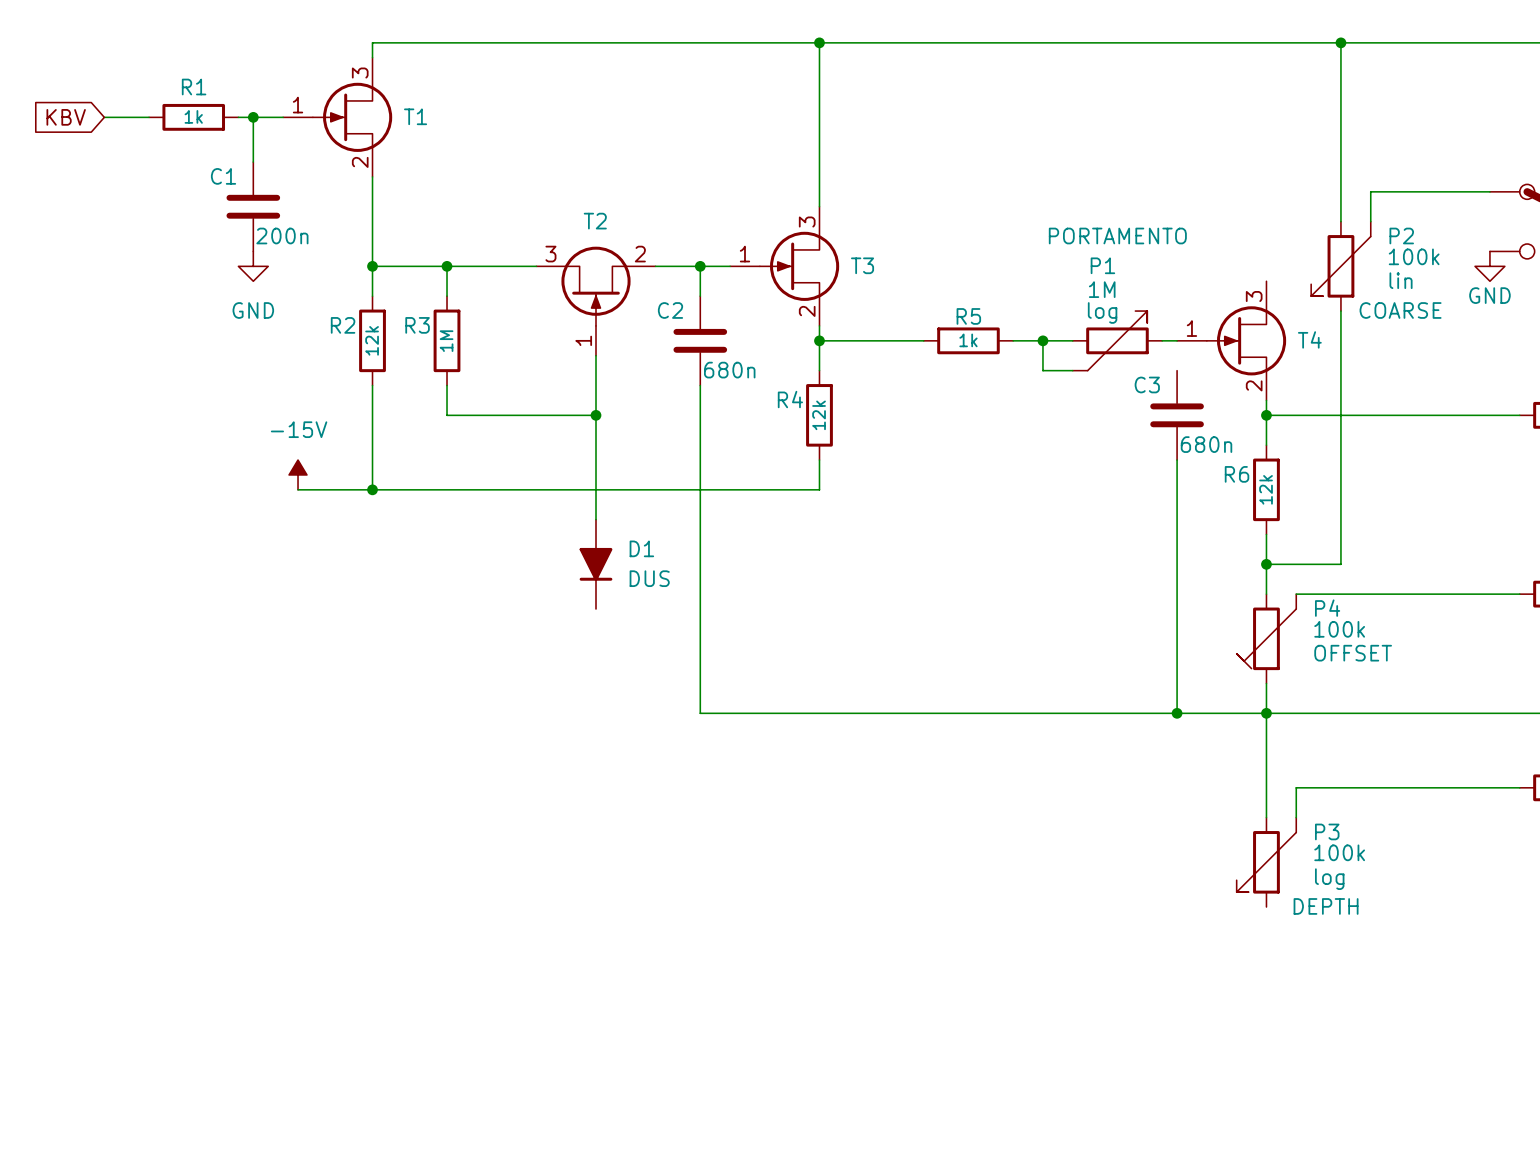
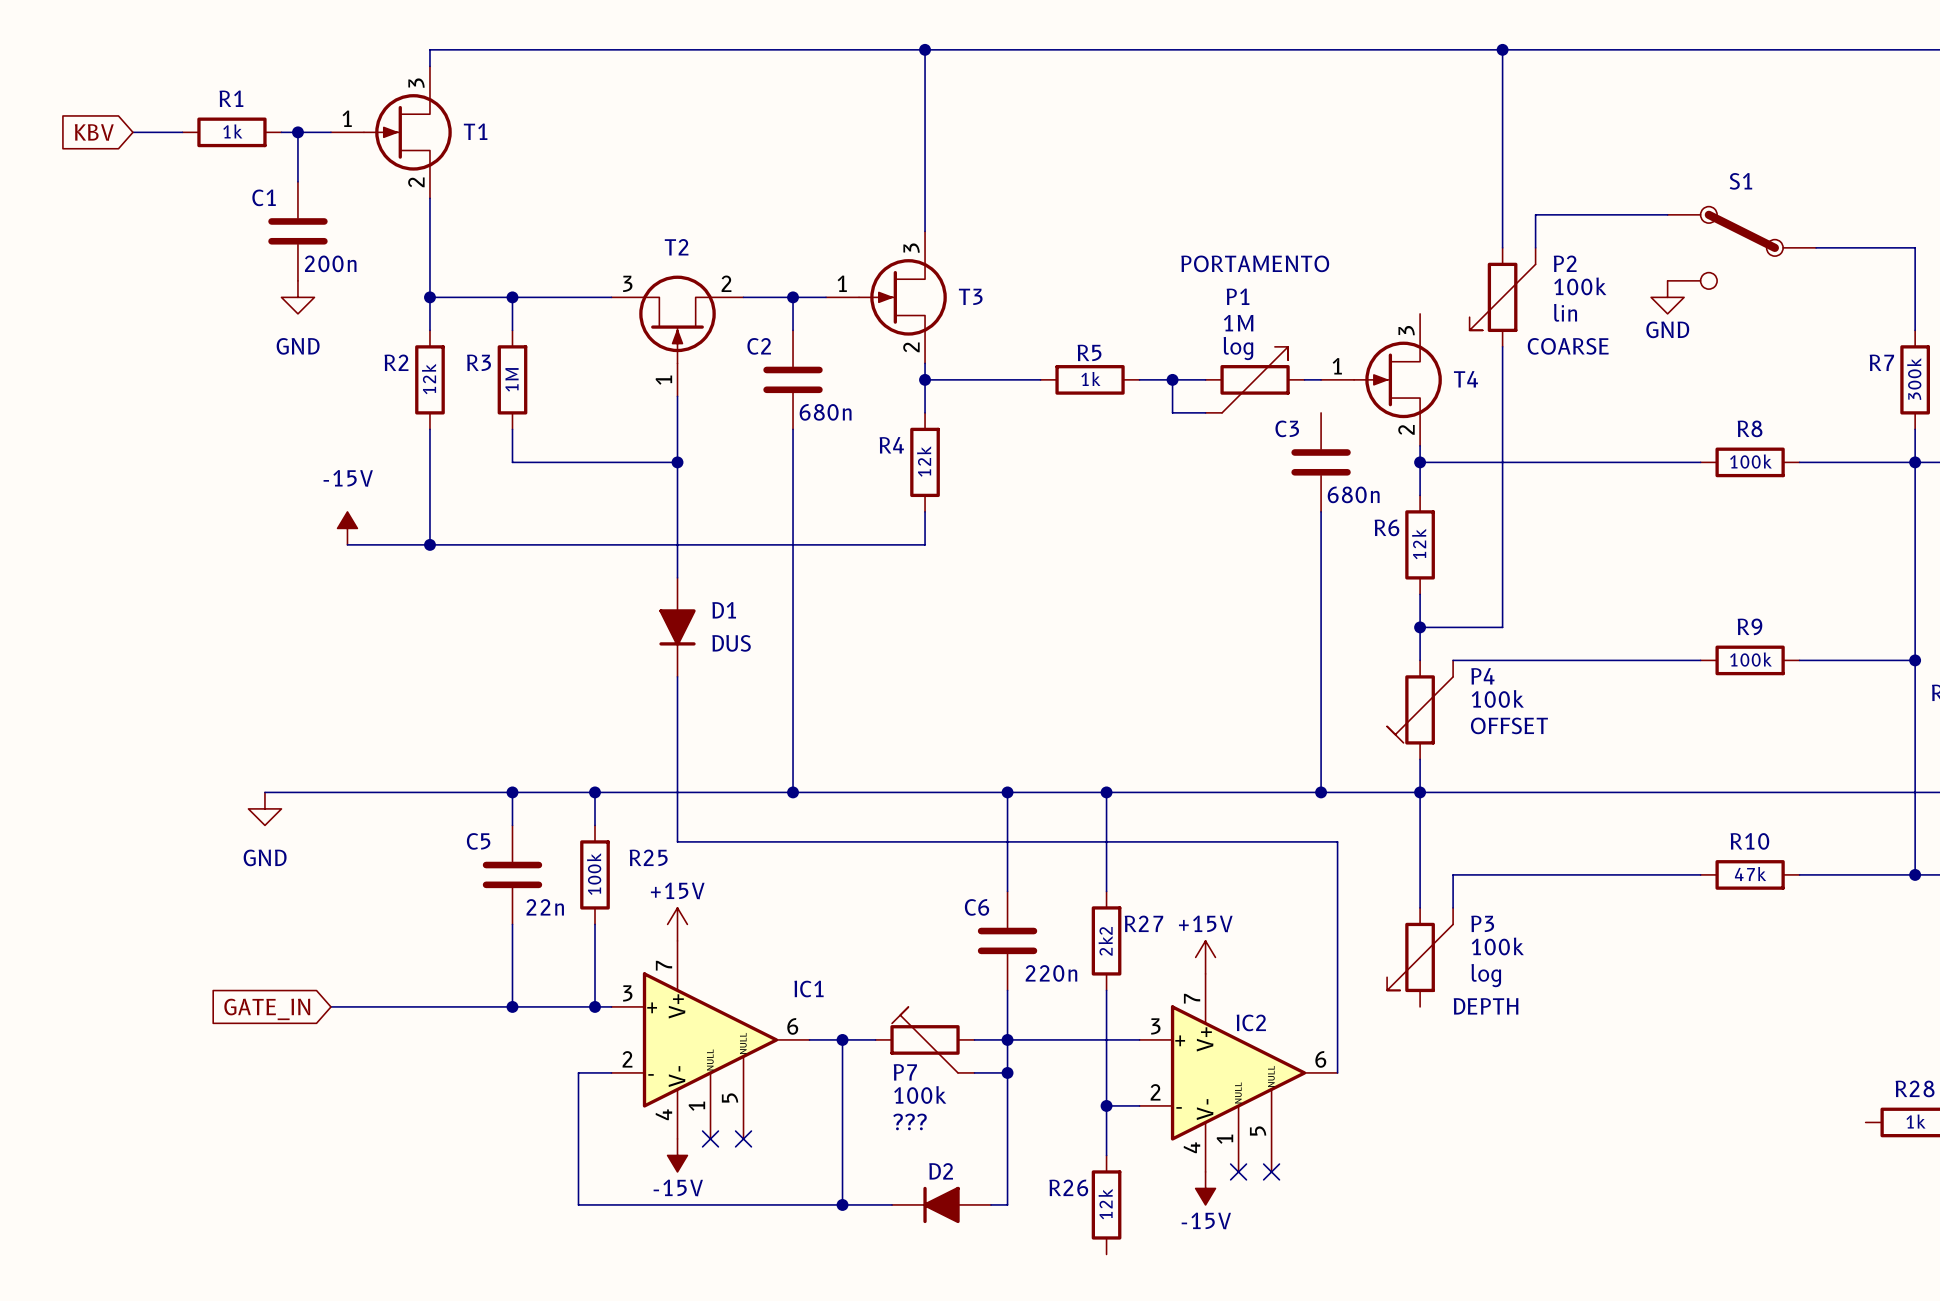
wire: none -> (677, 676) (677, 841) (1337, 841) (1337, 1072)
wire: none -> (264, 792) (793, 792)
wire: none -> (512, 792) (512, 825)
junction: none -> (512, 792)
wire: none -> (595, 792) (595, 825)
junction: none -> (595, 792)
junction: none -> (793, 792)
wire: none -> (1007, 792) (1007, 891)
junction: none -> (1007, 792)
wire: none -> (1106, 792) (1106, 891)
junction: none -> (1106, 792)
power symbol: none -> GND (264, 808)
C5: none -> 22n (512, 874)
R25: none -> 100k (595, 874)
wire: none -> (512, 924) (512, 1006)
wire: none -> (595, 924) (595, 1006)
power symbol: none -> +15V (677, 924)
C6: none -> 220n (1007, 940)
R27: none -> 2k2 (1106, 940)
power symbol: none -> +15V (1205, 957)
wire: none -> (1007, 990) (1007, 1204) (991, 1204)
wire: none -> (1106, 990) (1106, 1155)
global label: none -> GATE_IN (267, 1009)
wire: none -> (330, 1006) (611, 1006)
junction: none -> (512, 1006)
junction: none -> (595, 1006)
IC1: none -> (710, 1039)
wire: none -> (809, 1039) (875, 1039)
wire: none -> (842, 1039) (842, 1204)
junction: none -> (842, 1039)
P7: none -> 100k (925, 1039)
wire: none -> (974, 1039) (1139, 1039)
junction: none -> (1007, 1039)
wire: none -> (611, 1072) (578, 1072) (578, 1204) (892, 1204)
wire: none -> (974, 1072) (1007, 1072)
junction: none -> (1007, 1072)
IC2: none -> (1238, 1072)
wire: none -> (1106, 1105) (1139, 1105)
junction: none -> (1106, 1105)
no-connect mark: none -> (710, 1138)
no-connect mark: none -> (743, 1138)
power symbol: none -> -15V (677, 1155)
no-connect mark: none -> (1238, 1171)
no-connect mark: none -> (1271, 1171)
power symbol: none -> -15V (1205, 1188)
junction: none -> (842, 1204)
D2: none -> (941, 1204)
R26: none -> 12k (1106, 1204)

